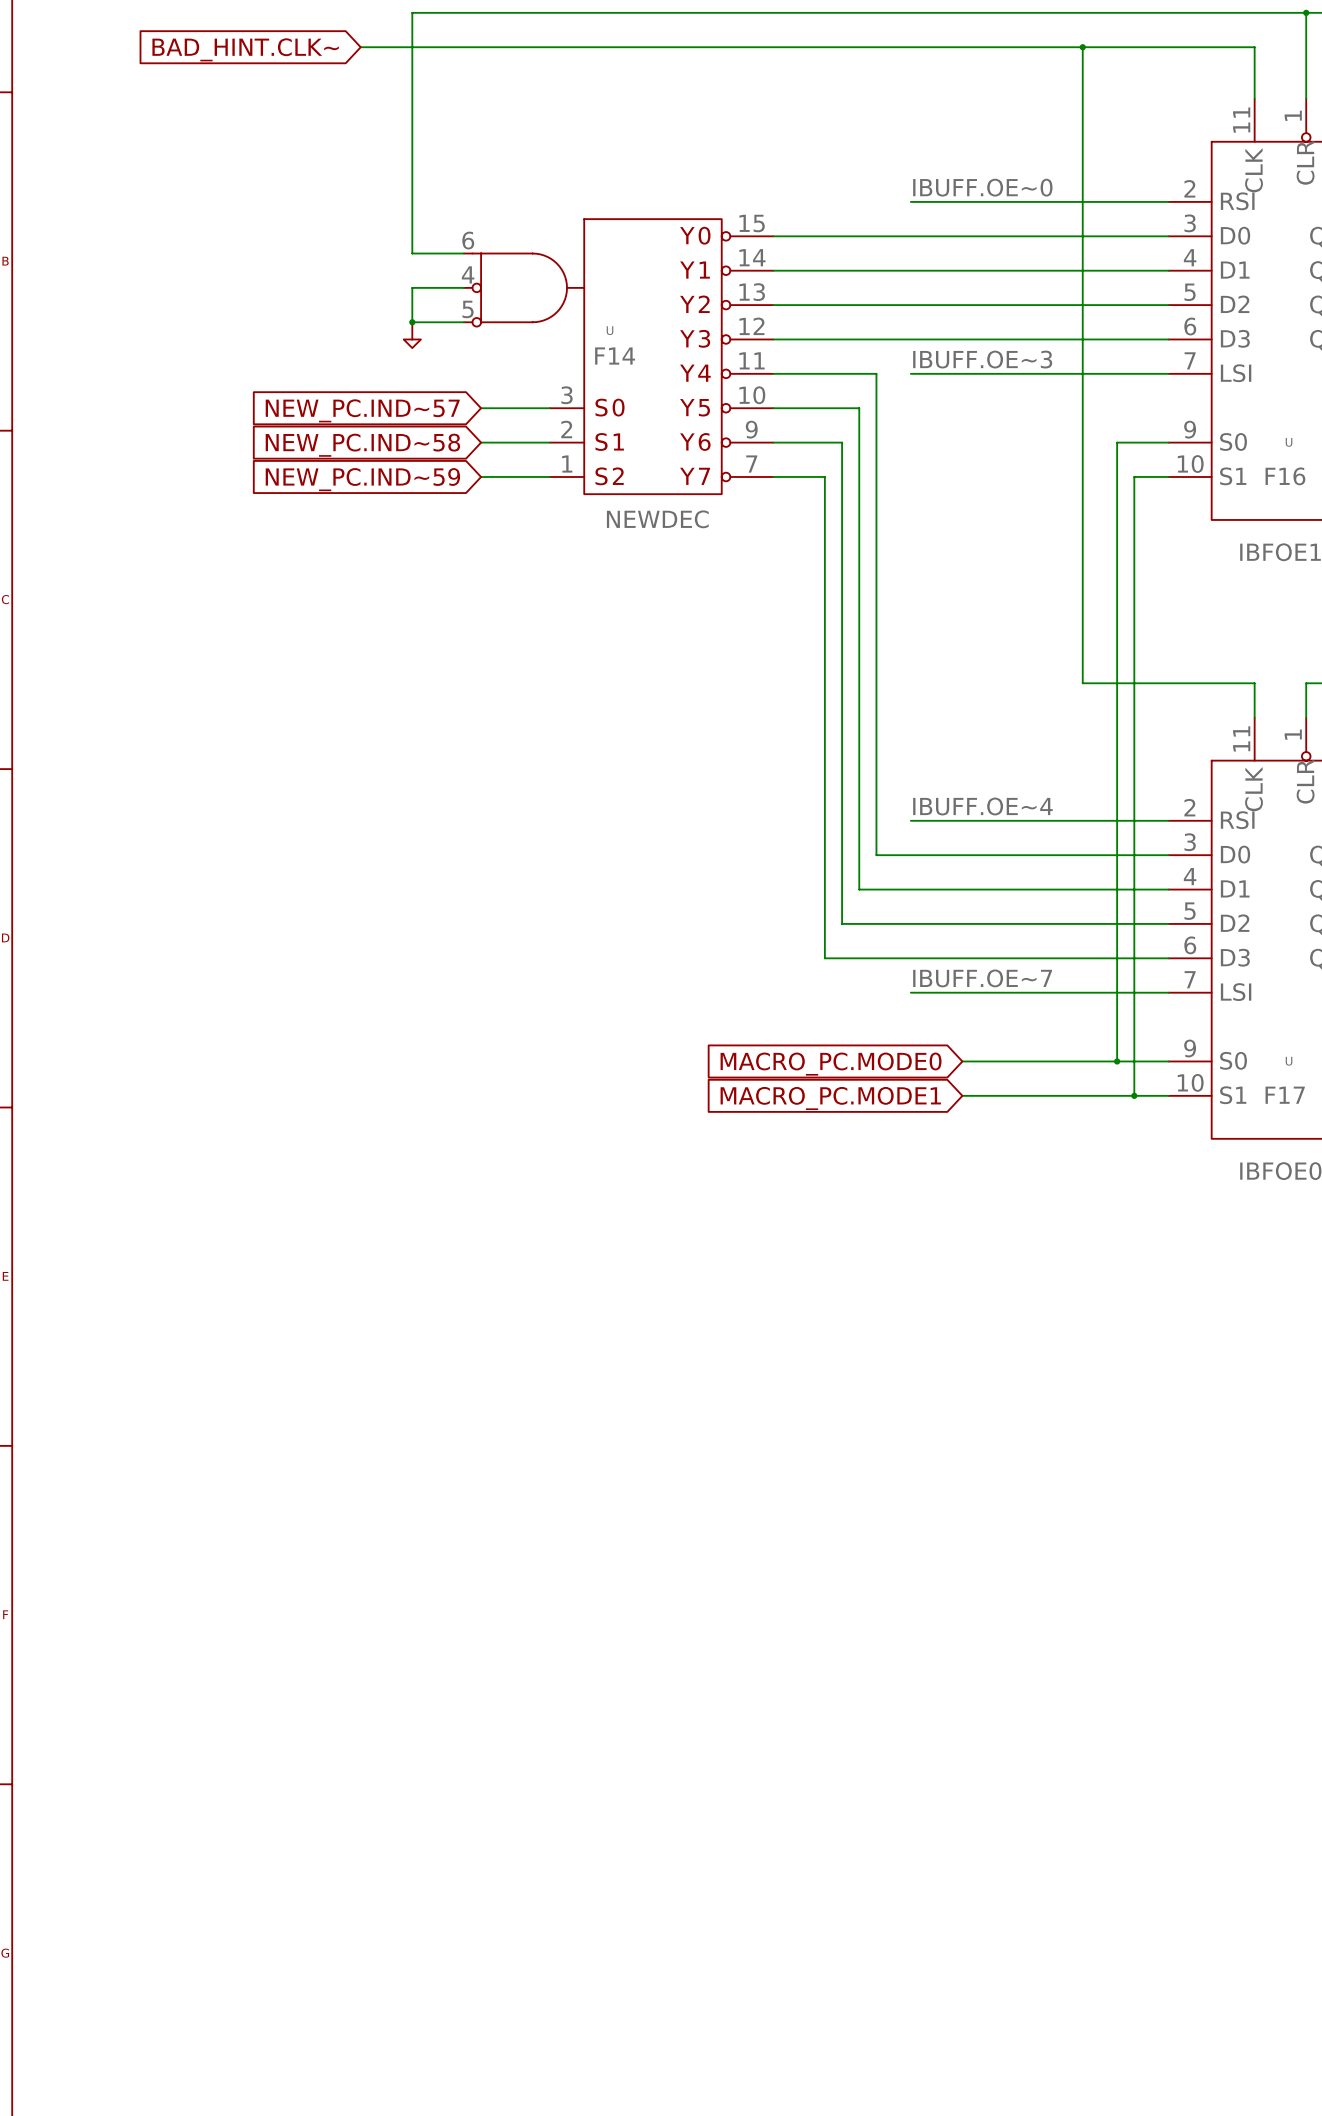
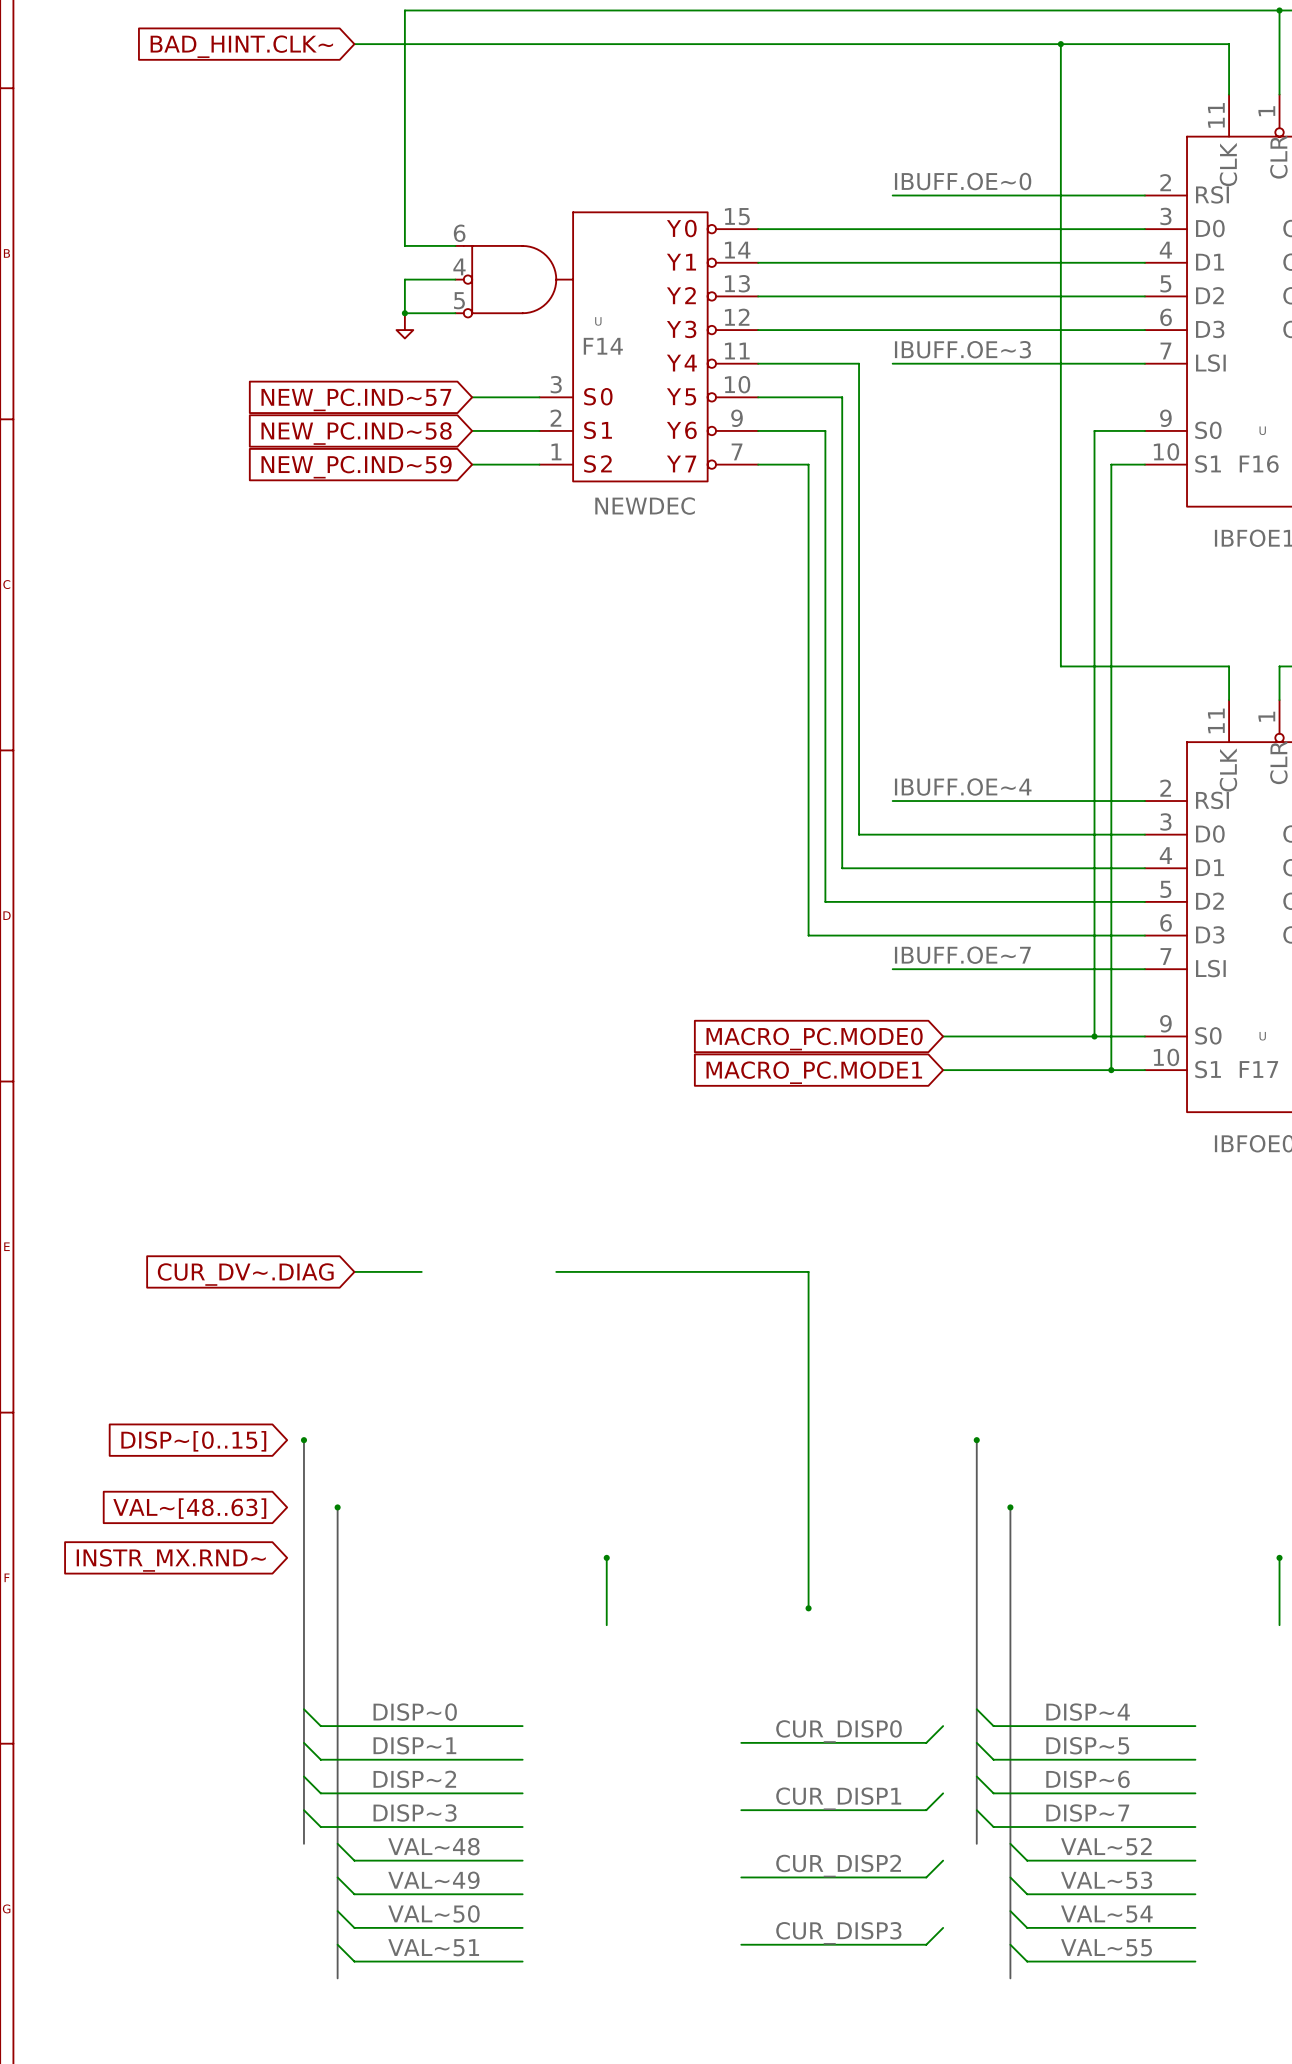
wire: none -> (354, 1271) (421, 1271)
wire: none -> (556, 1271) (808, 1271) (808, 1608)
global label: none -> CUR_DV~.DIAG (245, 1274)
bus: none -> (303, 1440) (303, 1843)
junction: none -> (303, 1440)
bus: none -> (976, 1440) (976, 1843)
junction: none -> (976, 1440)
global label: none -> DISP~[0..15] (193, 1441)
bus: none -> (337, 1507) (337, 1978)
junction: none -> (337, 1507)
bus: none -> (1010, 1507) (1010, 1978)
junction: none -> (1010, 1507)
global label: none -> VAL~[48..63] (189, 1508)
wire: none -> (606, 1557) (606, 1625)
junction: none -> (606, 1557)
wire: none -> (1279, 1557) (1279, 1625)
junction: none -> (1279, 1557)
global label: none -> INSTR_MX.RND~ (171, 1560)
junction: none -> (808, 1608)
wire: none -> (303, 1709) (320, 1726) (522, 1726)
wire: none -> (976, 1709) (993, 1726) (1195, 1726)
label: none -> DISP~0 (415, 1712)
label: none -> DISP~4 (1088, 1712)
wire: none -> (943, 1726) (926, 1742) (741, 1742)
label: none -> CUR_DISP0 (838, 1731)
wire: none -> (303, 1742) (320, 1759) (522, 1759)
wire: none -> (976, 1742) (993, 1759) (1195, 1759)
label: none -> DISP~1 (414, 1745)
label: none -> DISP~5 (1087, 1745)
wire: none -> (303, 1776) (320, 1793) (522, 1793)
wire: none -> (976, 1776) (993, 1793) (1195, 1793)
label: none -> DISP~2 (414, 1779)
label: none -> DISP~6 (1088, 1779)
wire: none -> (943, 1793) (926, 1810) (741, 1810)
label: none -> CUR_DISP1 (838, 1798)
wire: none -> (303, 1810) (320, 1827) (522, 1827)
wire: none -> (976, 1810) (993, 1827) (1195, 1827)
label: none -> DISP~3 (415, 1813)
label: none -> DISP~7 (1087, 1813)
wire: none -> (337, 1843) (354, 1860) (522, 1860)
wire: none -> (1010, 1843) (1027, 1860) (1195, 1860)
label: none -> VAL~48 (433, 1846)
label: none -> VAL~52 (1106, 1846)
wire: none -> (943, 1860) (926, 1877) (741, 1877)
label: none -> CUR_DISP2 (838, 1866)
wire: none -> (337, 1877) (354, 1894) (522, 1894)
wire: none -> (1010, 1877) (1027, 1894) (1195, 1894)
label: none -> VAL~49 (433, 1880)
label: none -> VAL~53 (1106, 1880)
wire: none -> (337, 1911) (354, 1927) (522, 1927)
wire: none -> (1010, 1911) (1027, 1927) (1195, 1927)
label: none -> VAL~50 (433, 1913)
label: none -> VAL~54 (1106, 1914)
wire: none -> (943, 1927) (926, 1944) (741, 1944)
label: none -> CUR_DISP3 (838, 1933)
wire: none -> (337, 1944) (354, 1961) (522, 1961)
wire: none -> (1010, 1944) (1027, 1961) (1195, 1961)
label: none -> VAL~51 (433, 1947)
label: none -> VAL~55 (1106, 1947)

